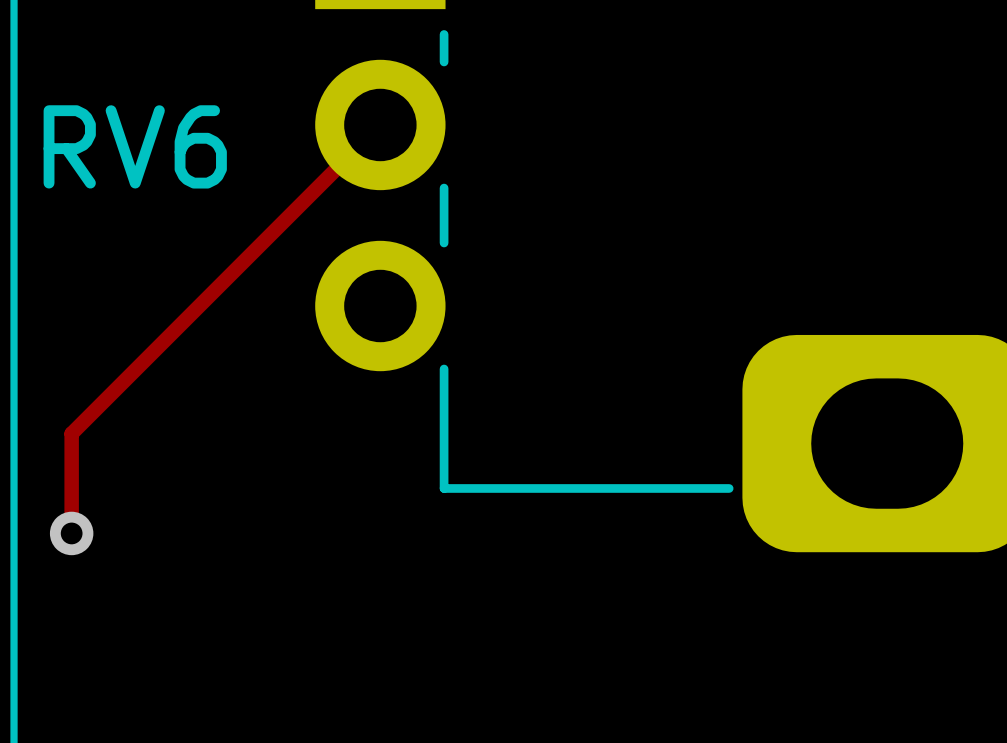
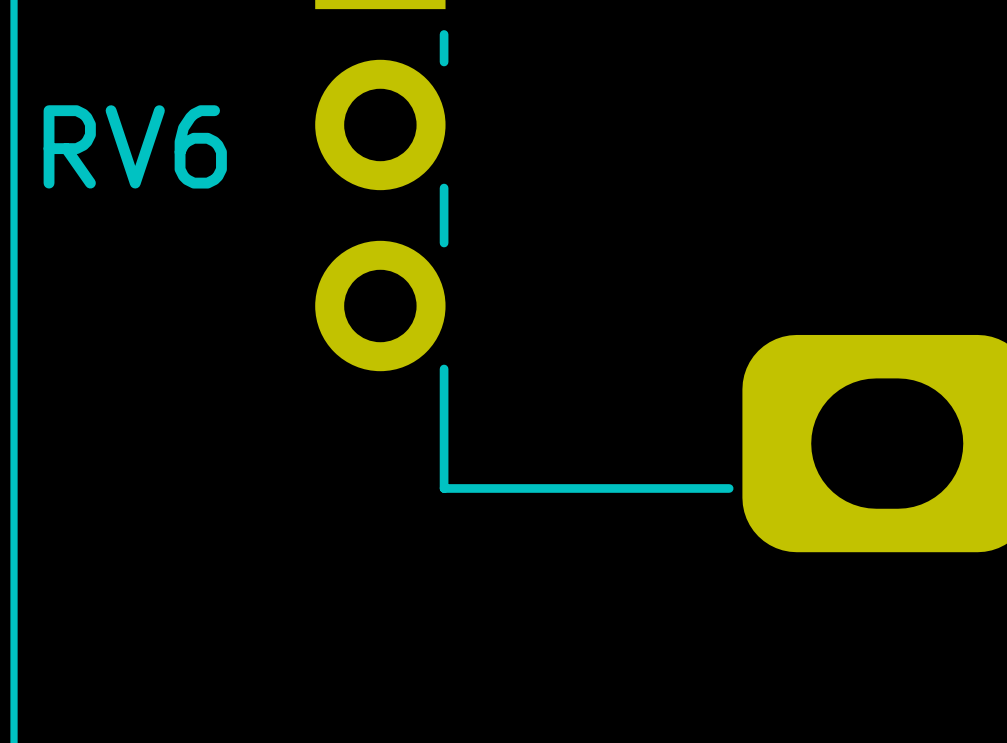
track: (380, 124) (71, 433) (71, 533) -> none
via: (71, 533) -> none

